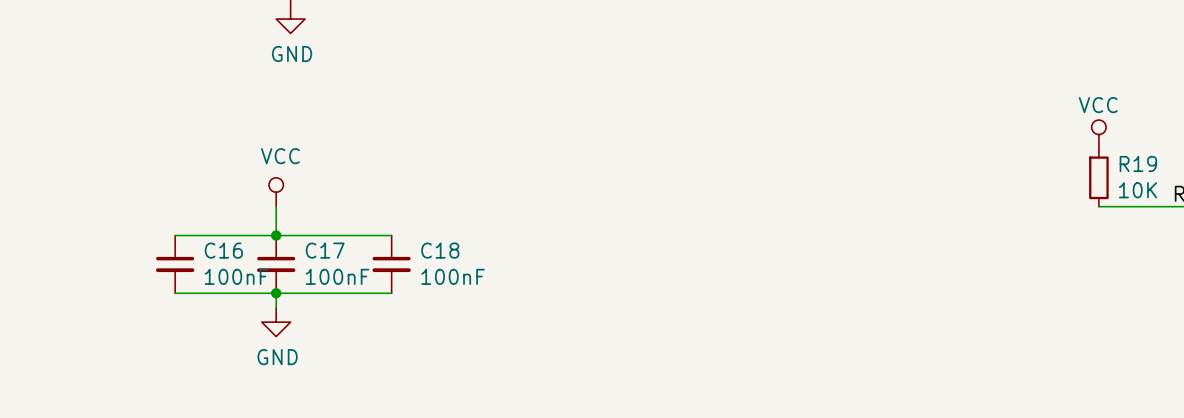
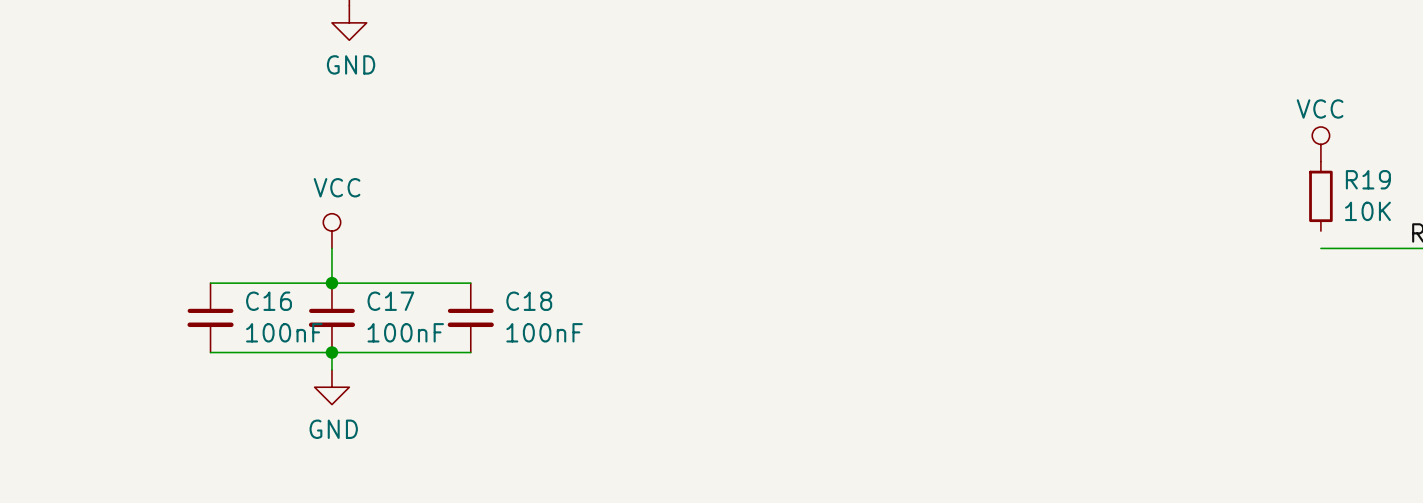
power symbol position: VCC (1098, 134) -> VCC (1320, 144)
R19 position: (1098, 177) -> (1320, 196)

